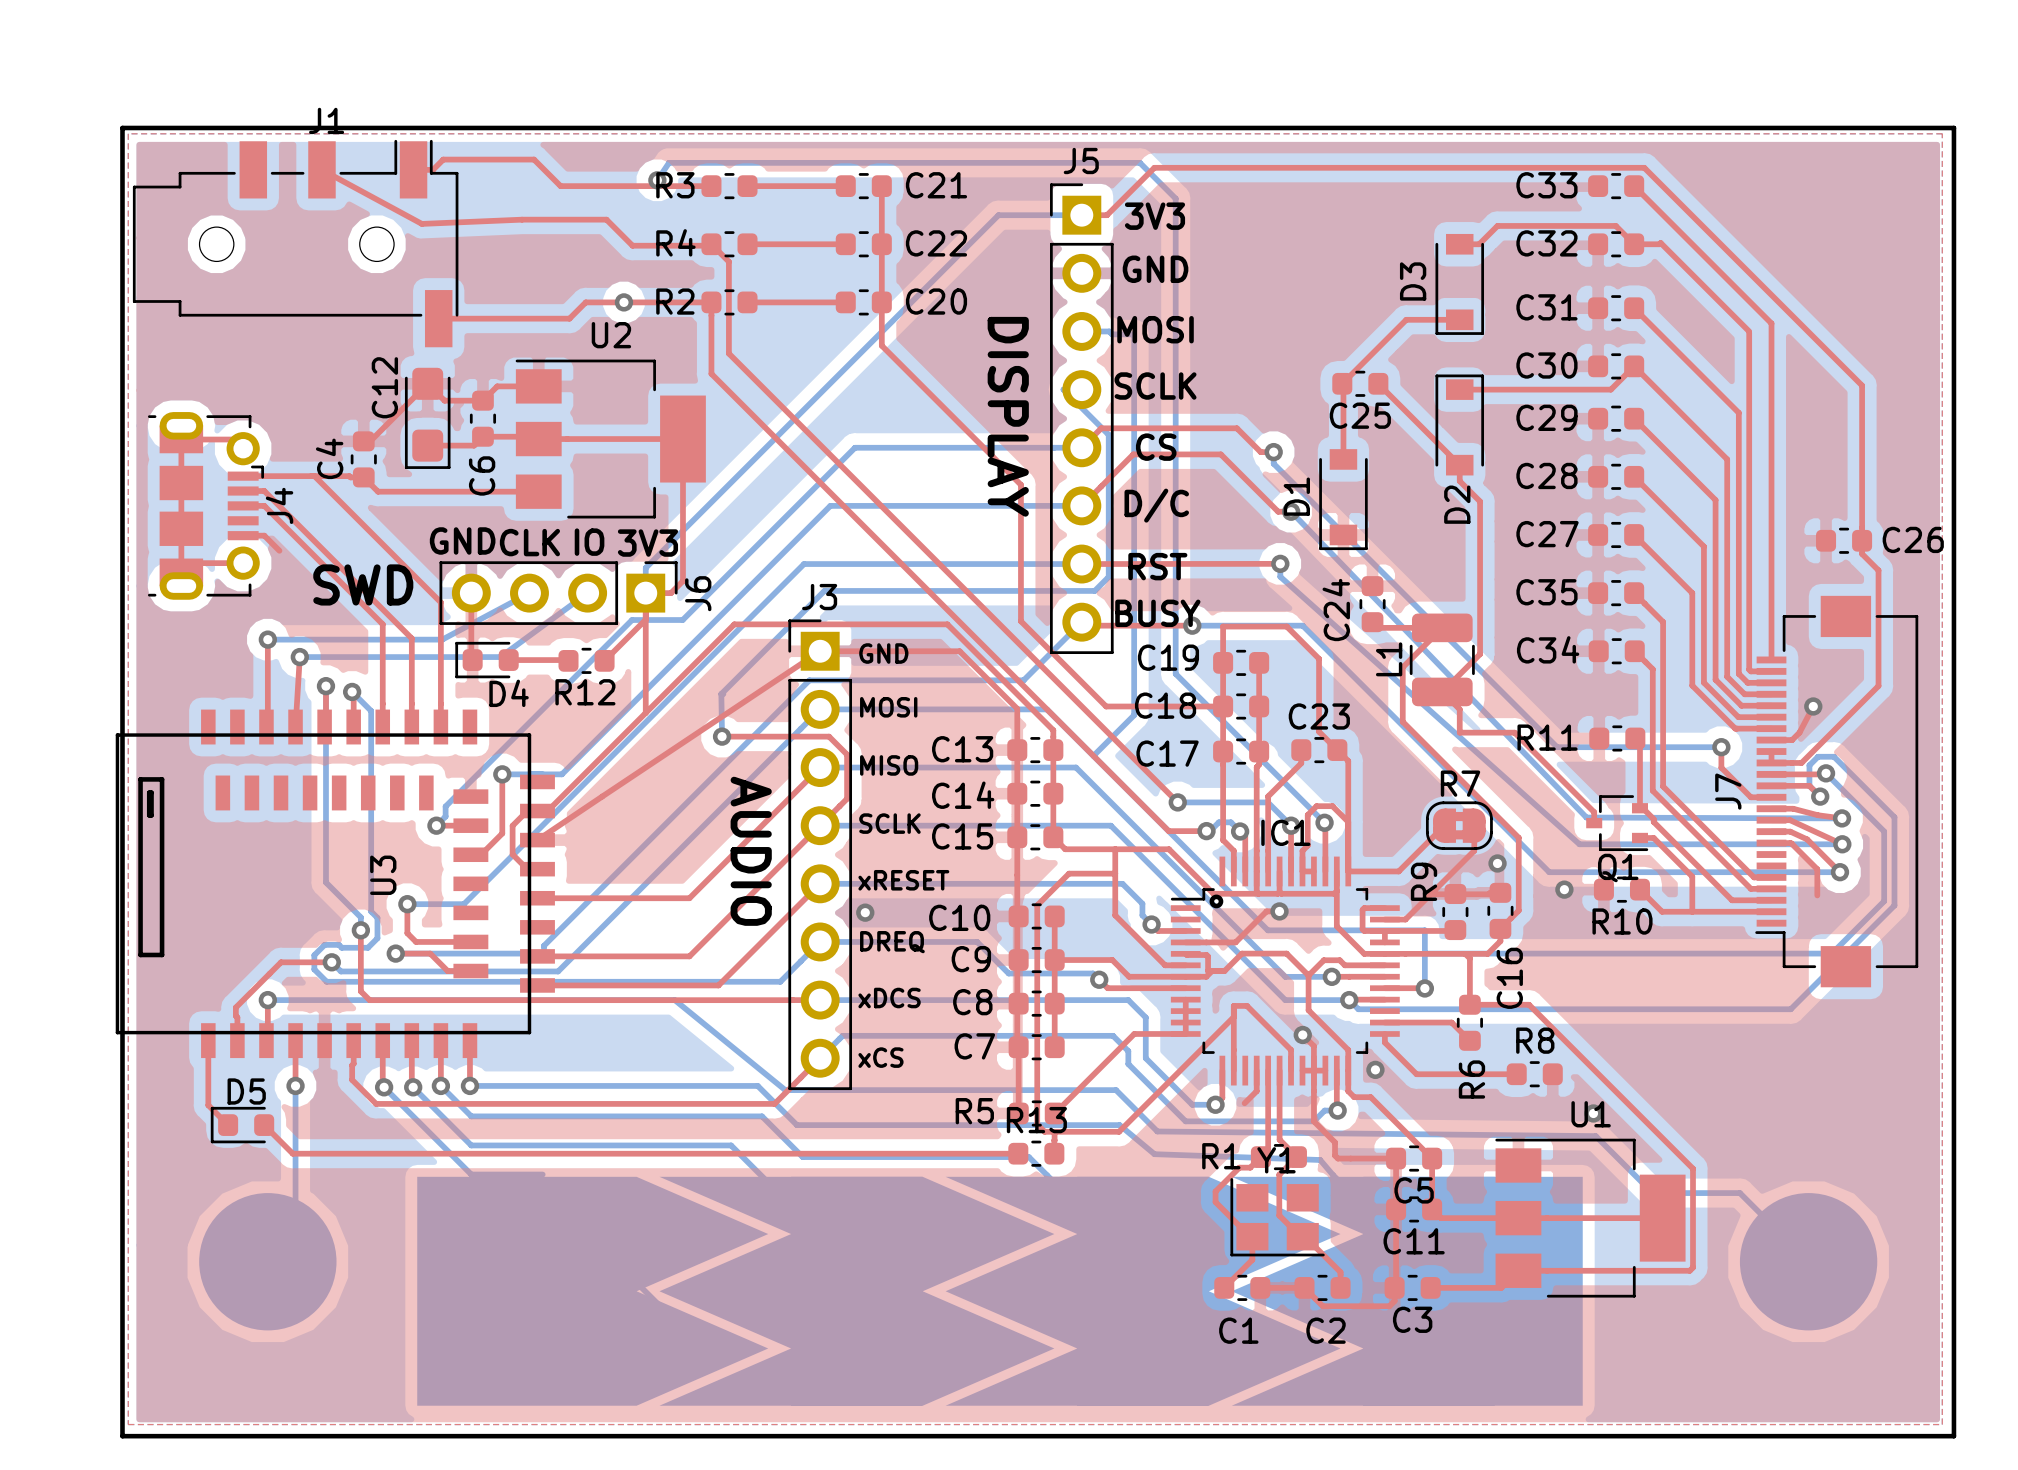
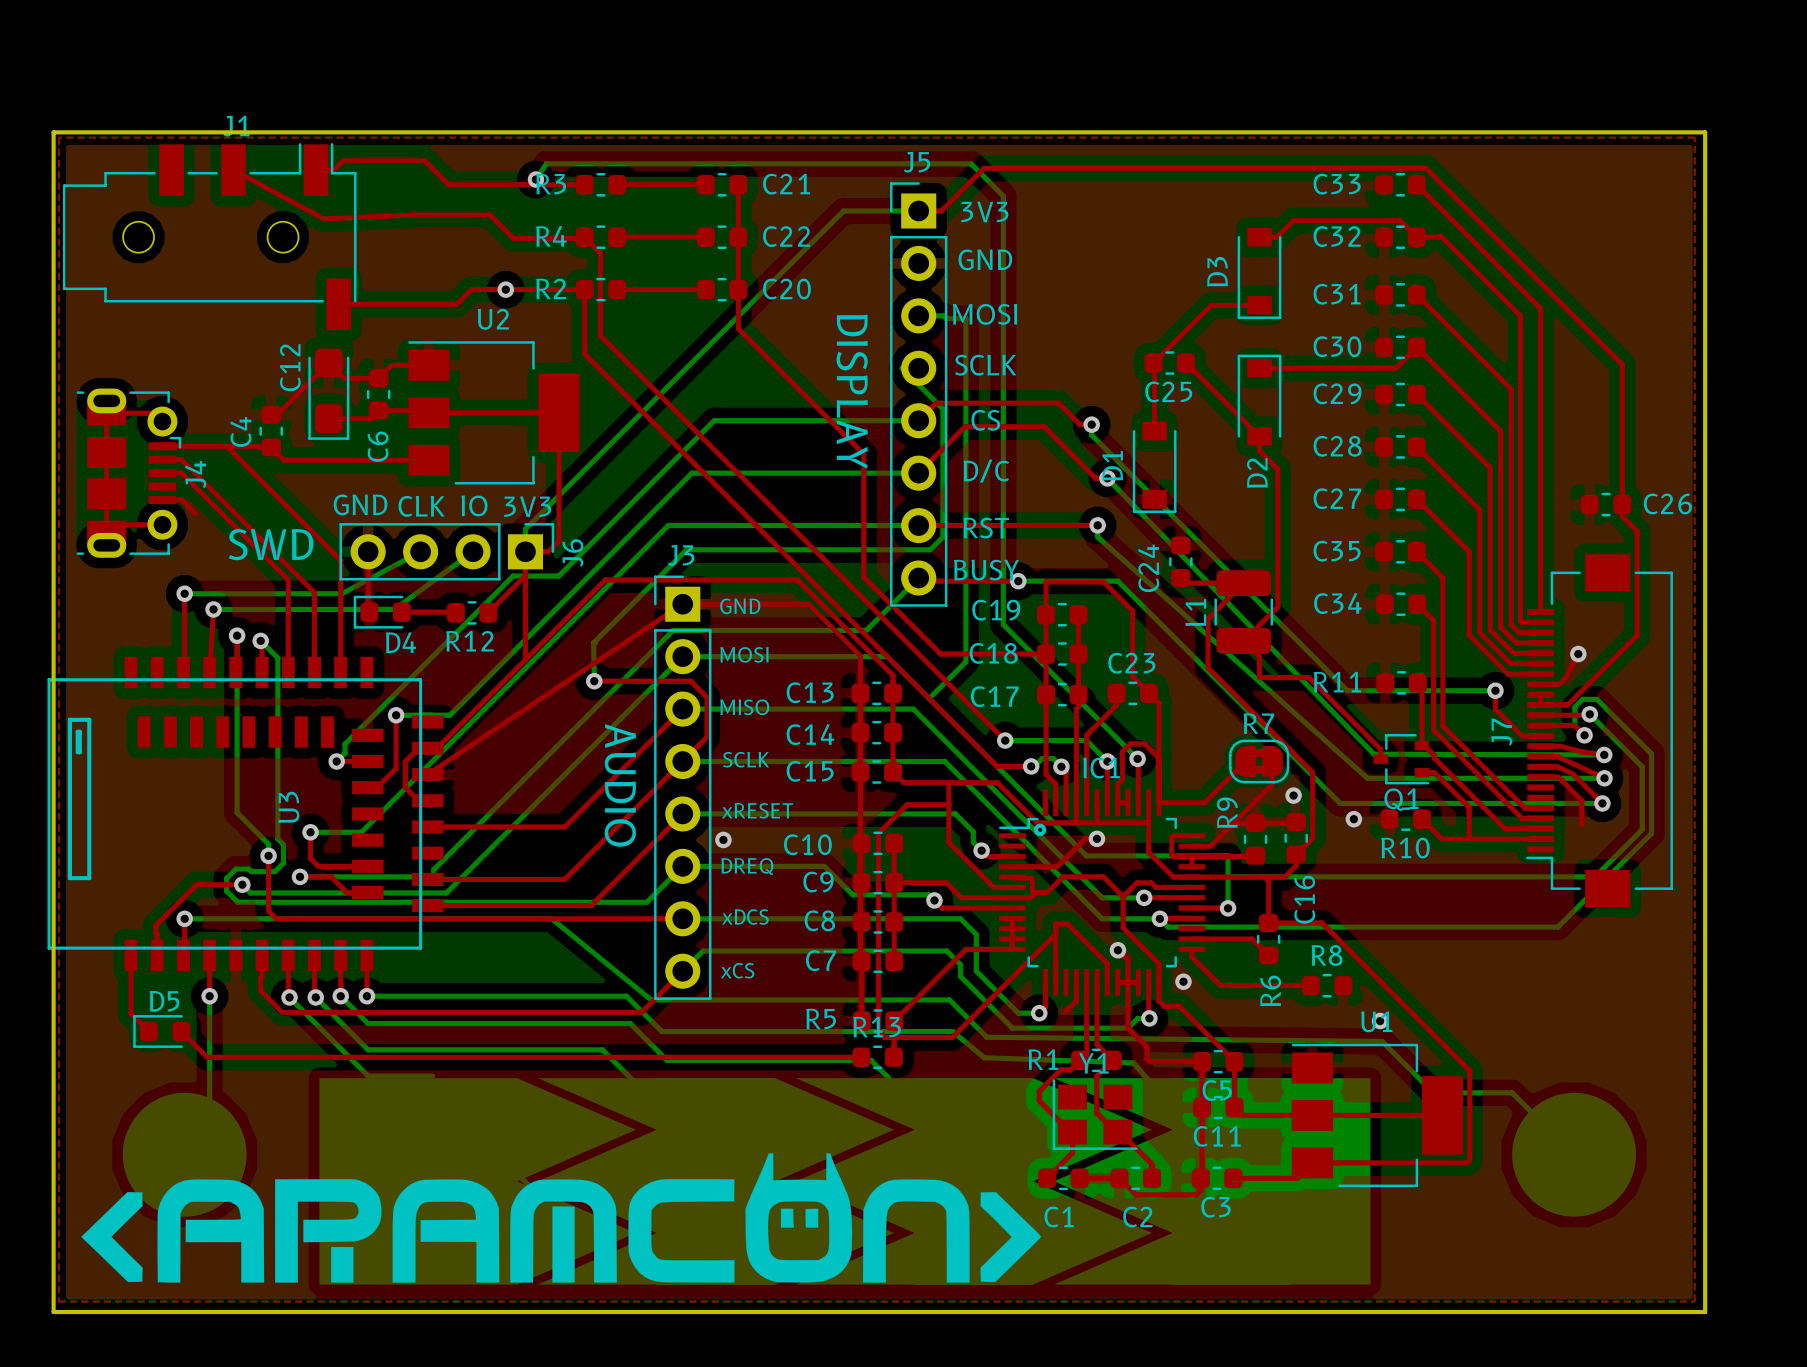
drawing: none -> [81, 1153, 1042, 1283]

